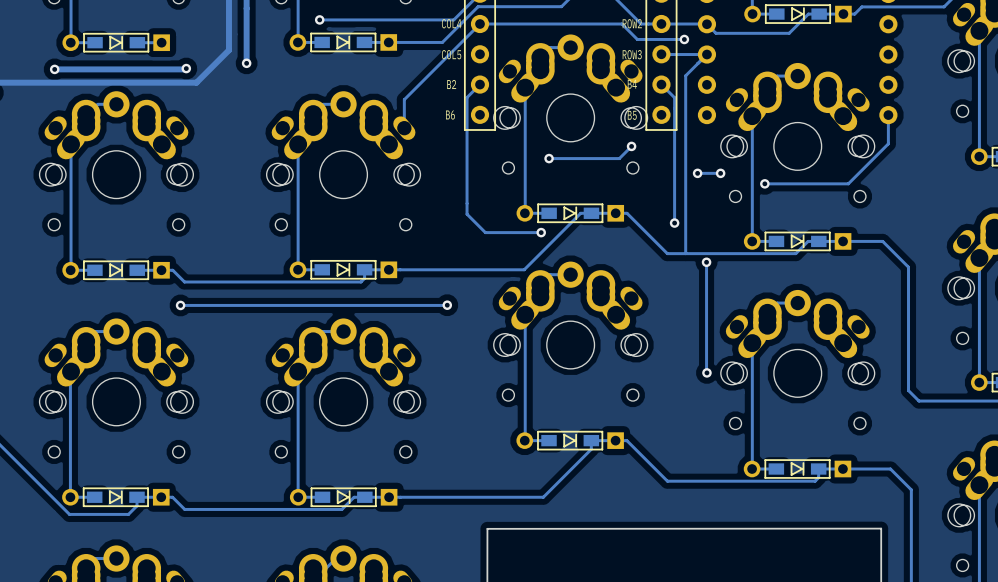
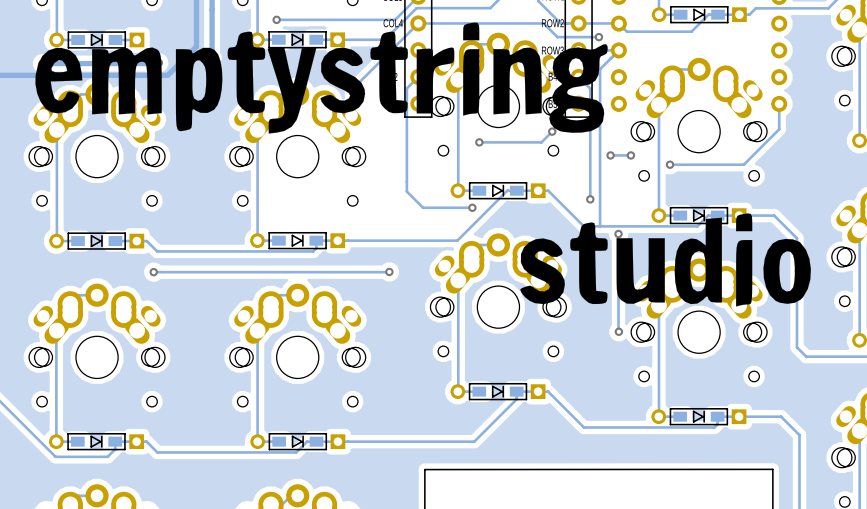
drawing: none -> [35, 22, 811, 307]

